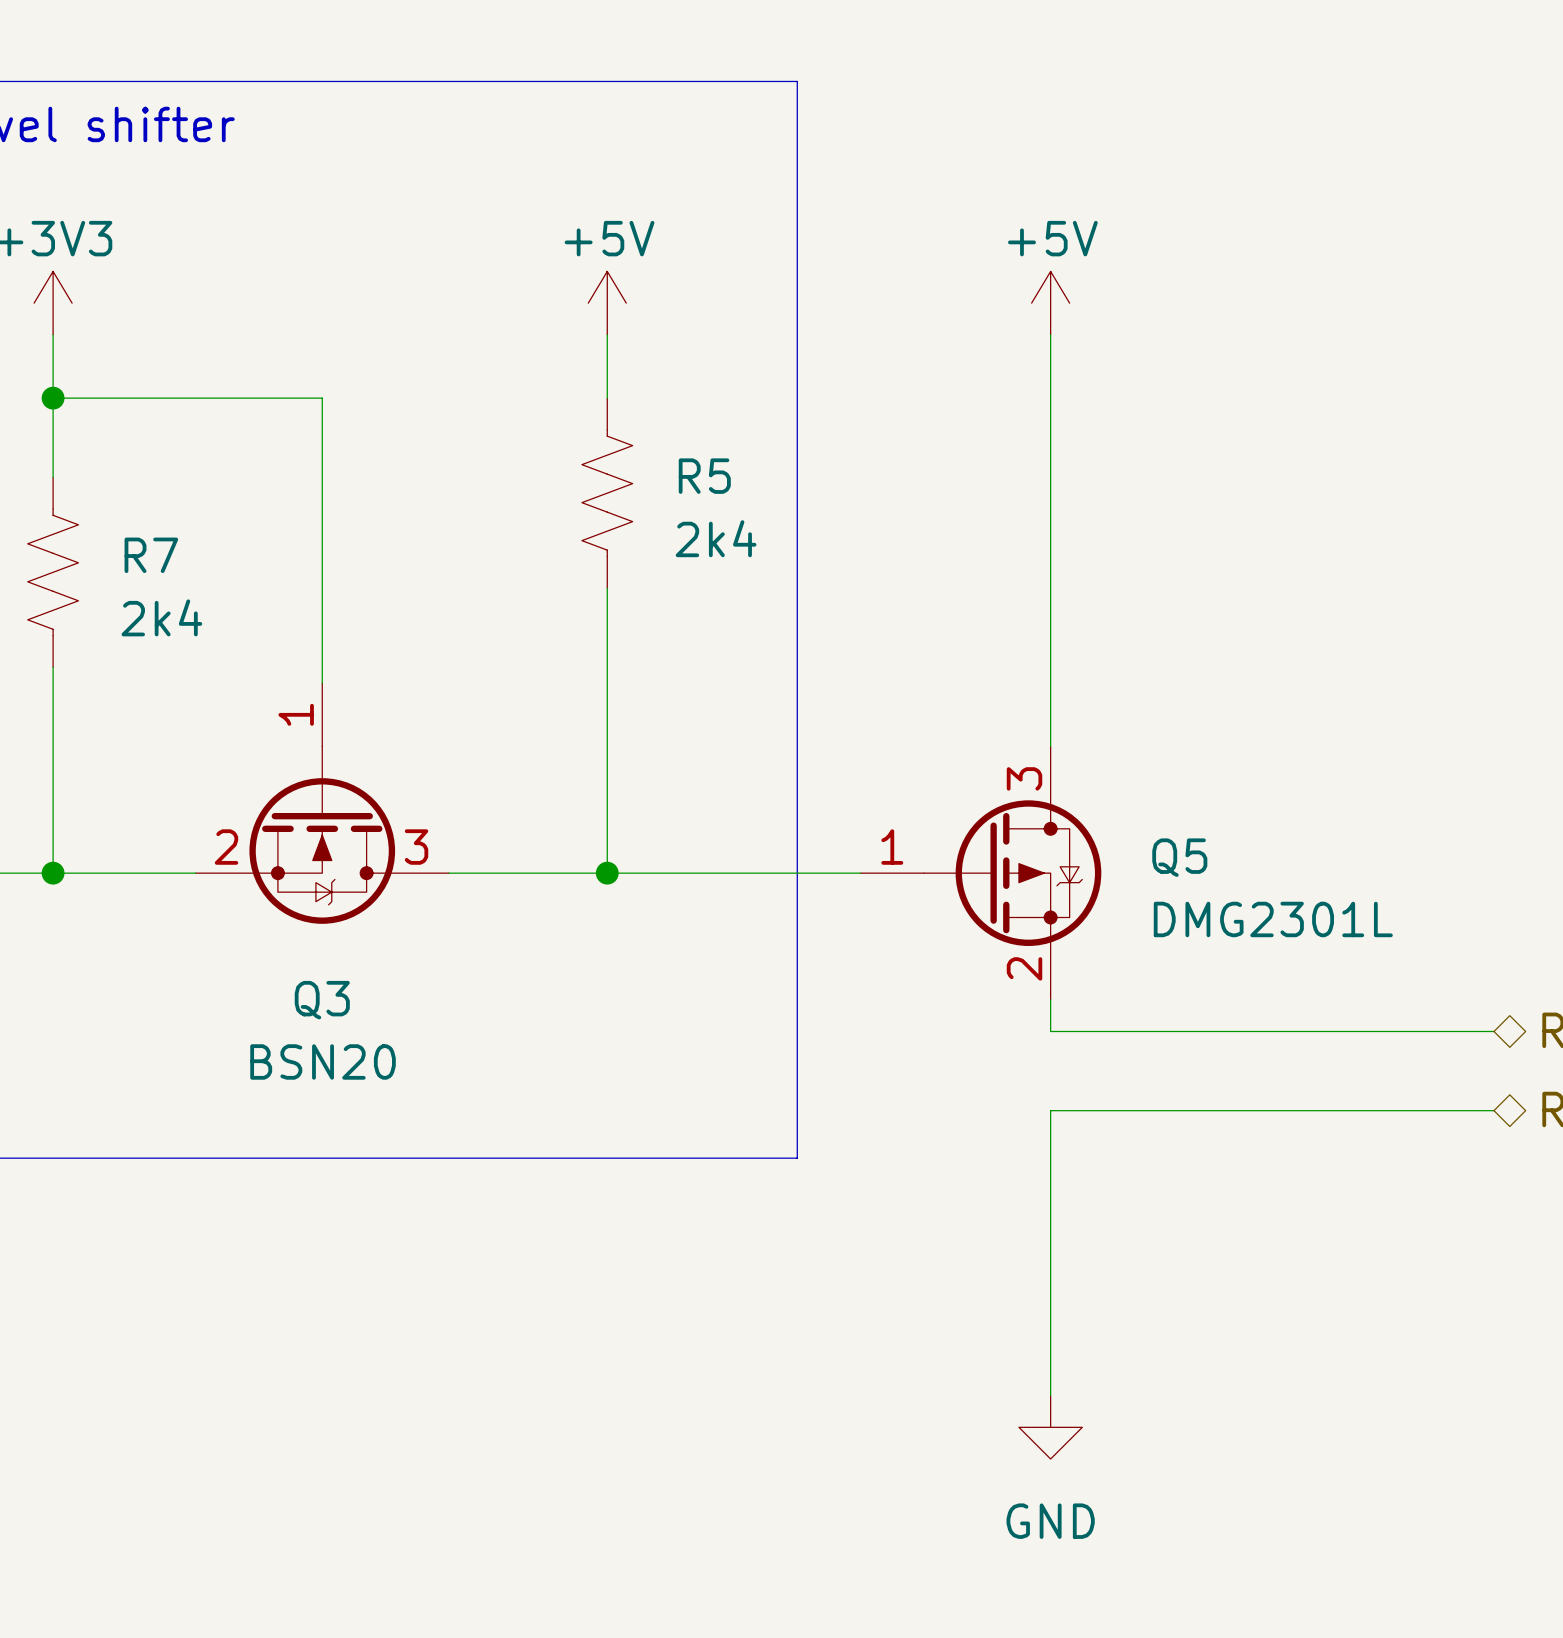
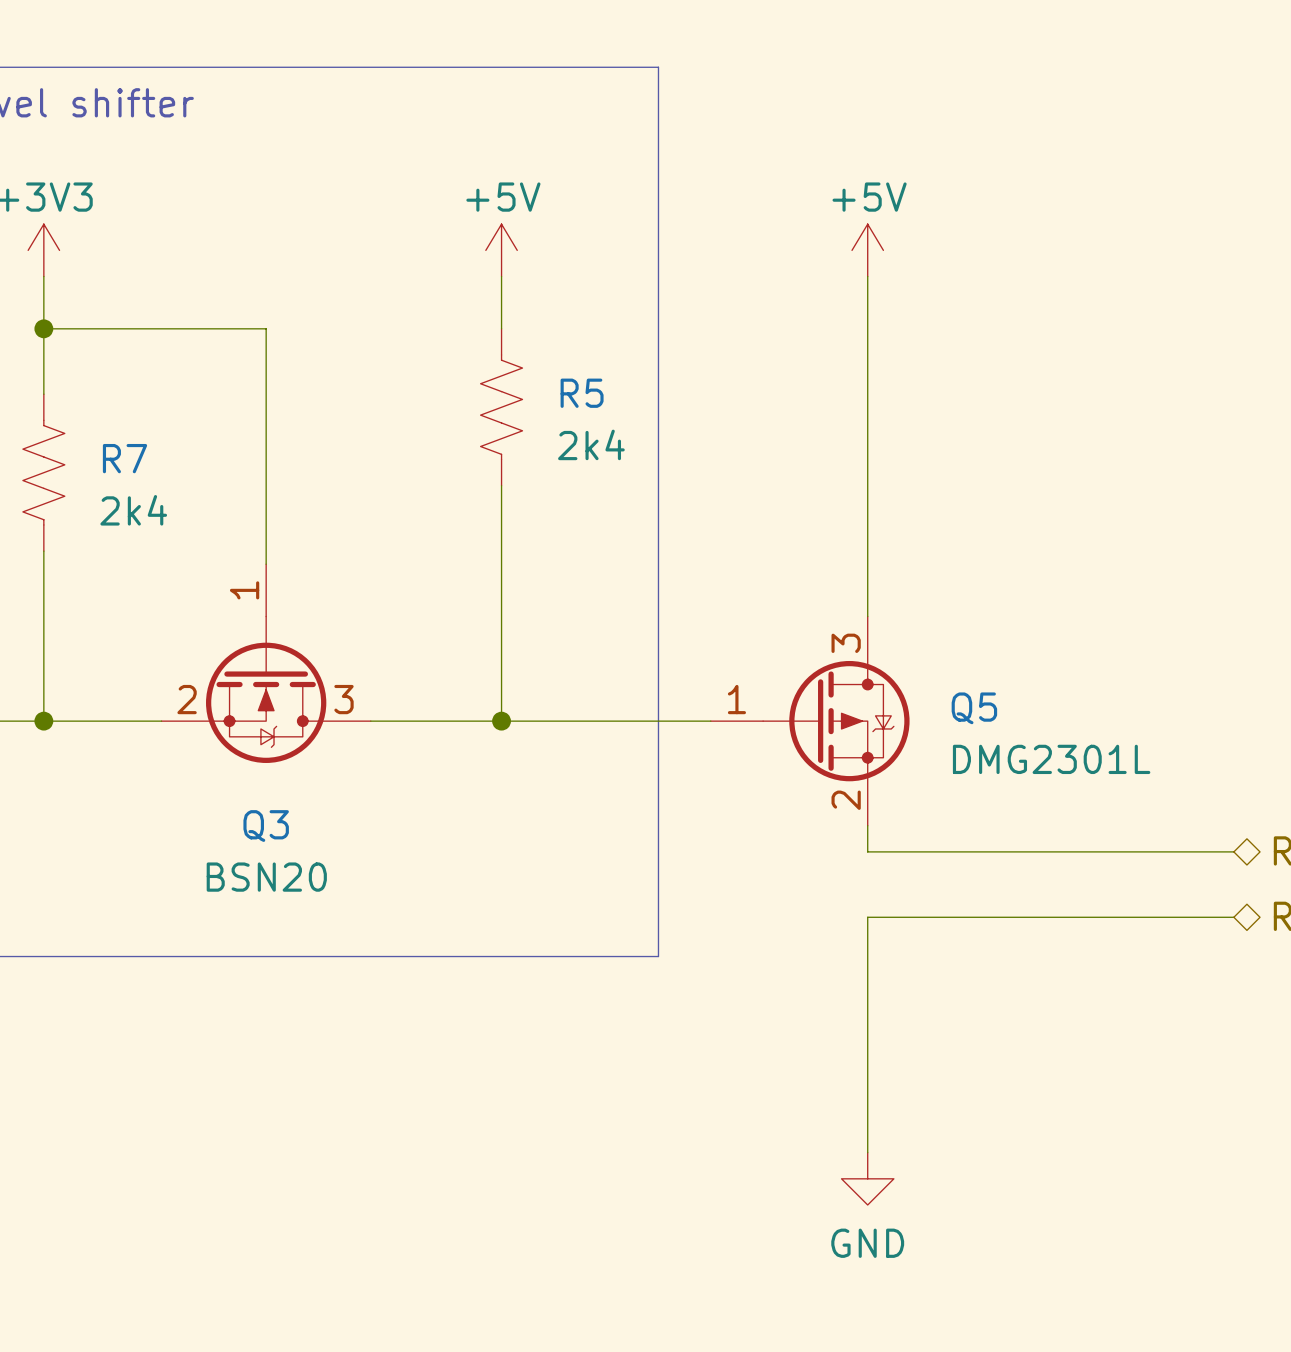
power symbol text position: GND (1050, 1521) -> GND (867, 1243)

